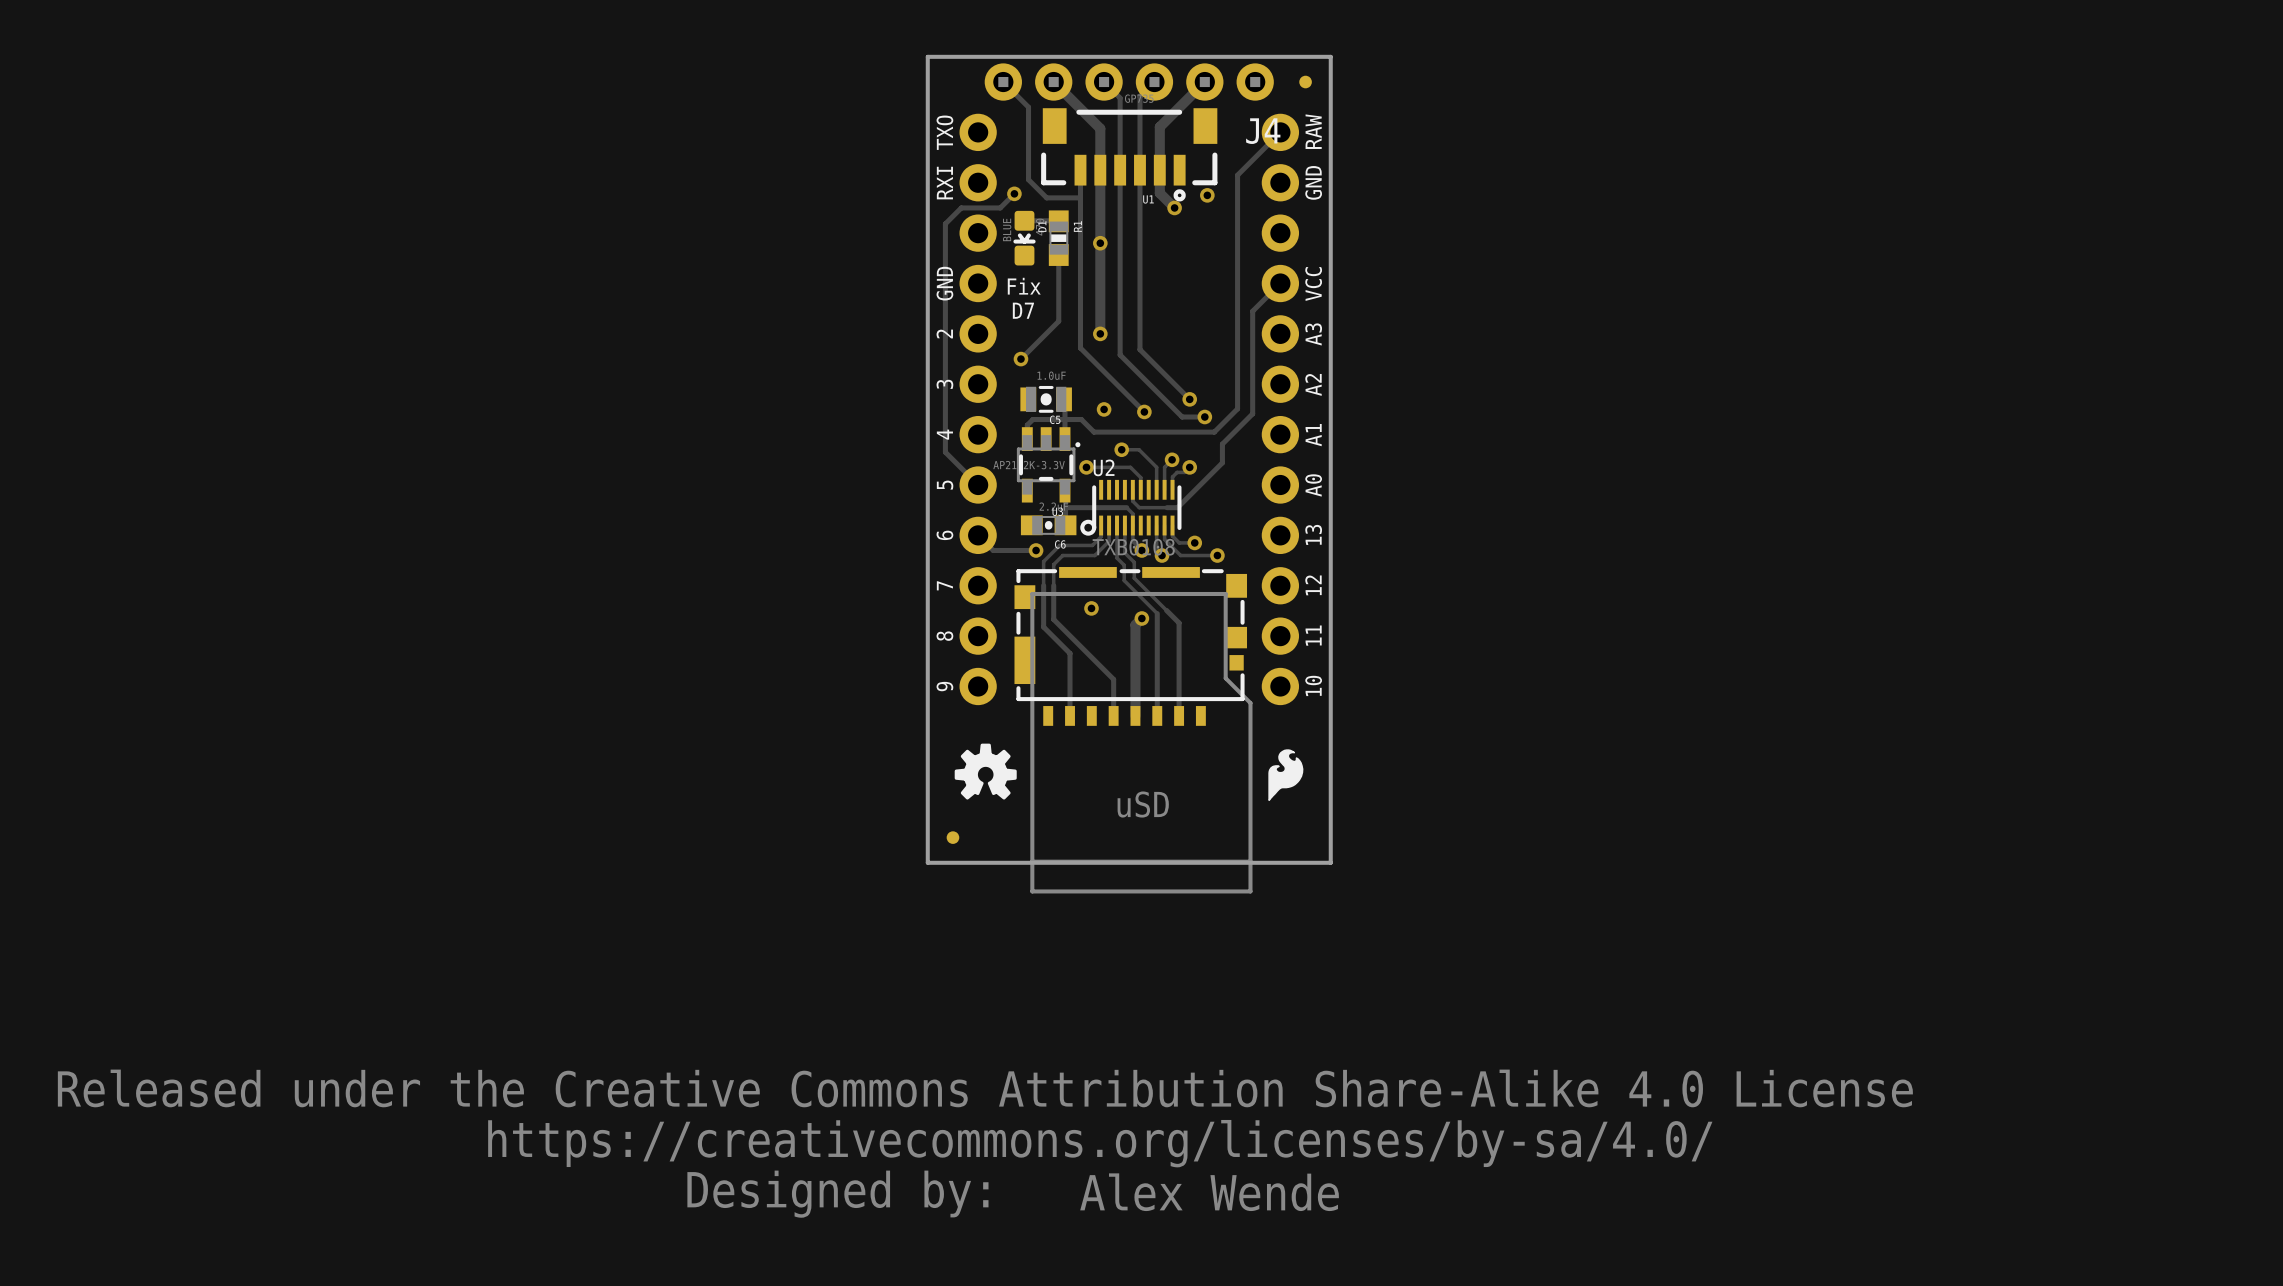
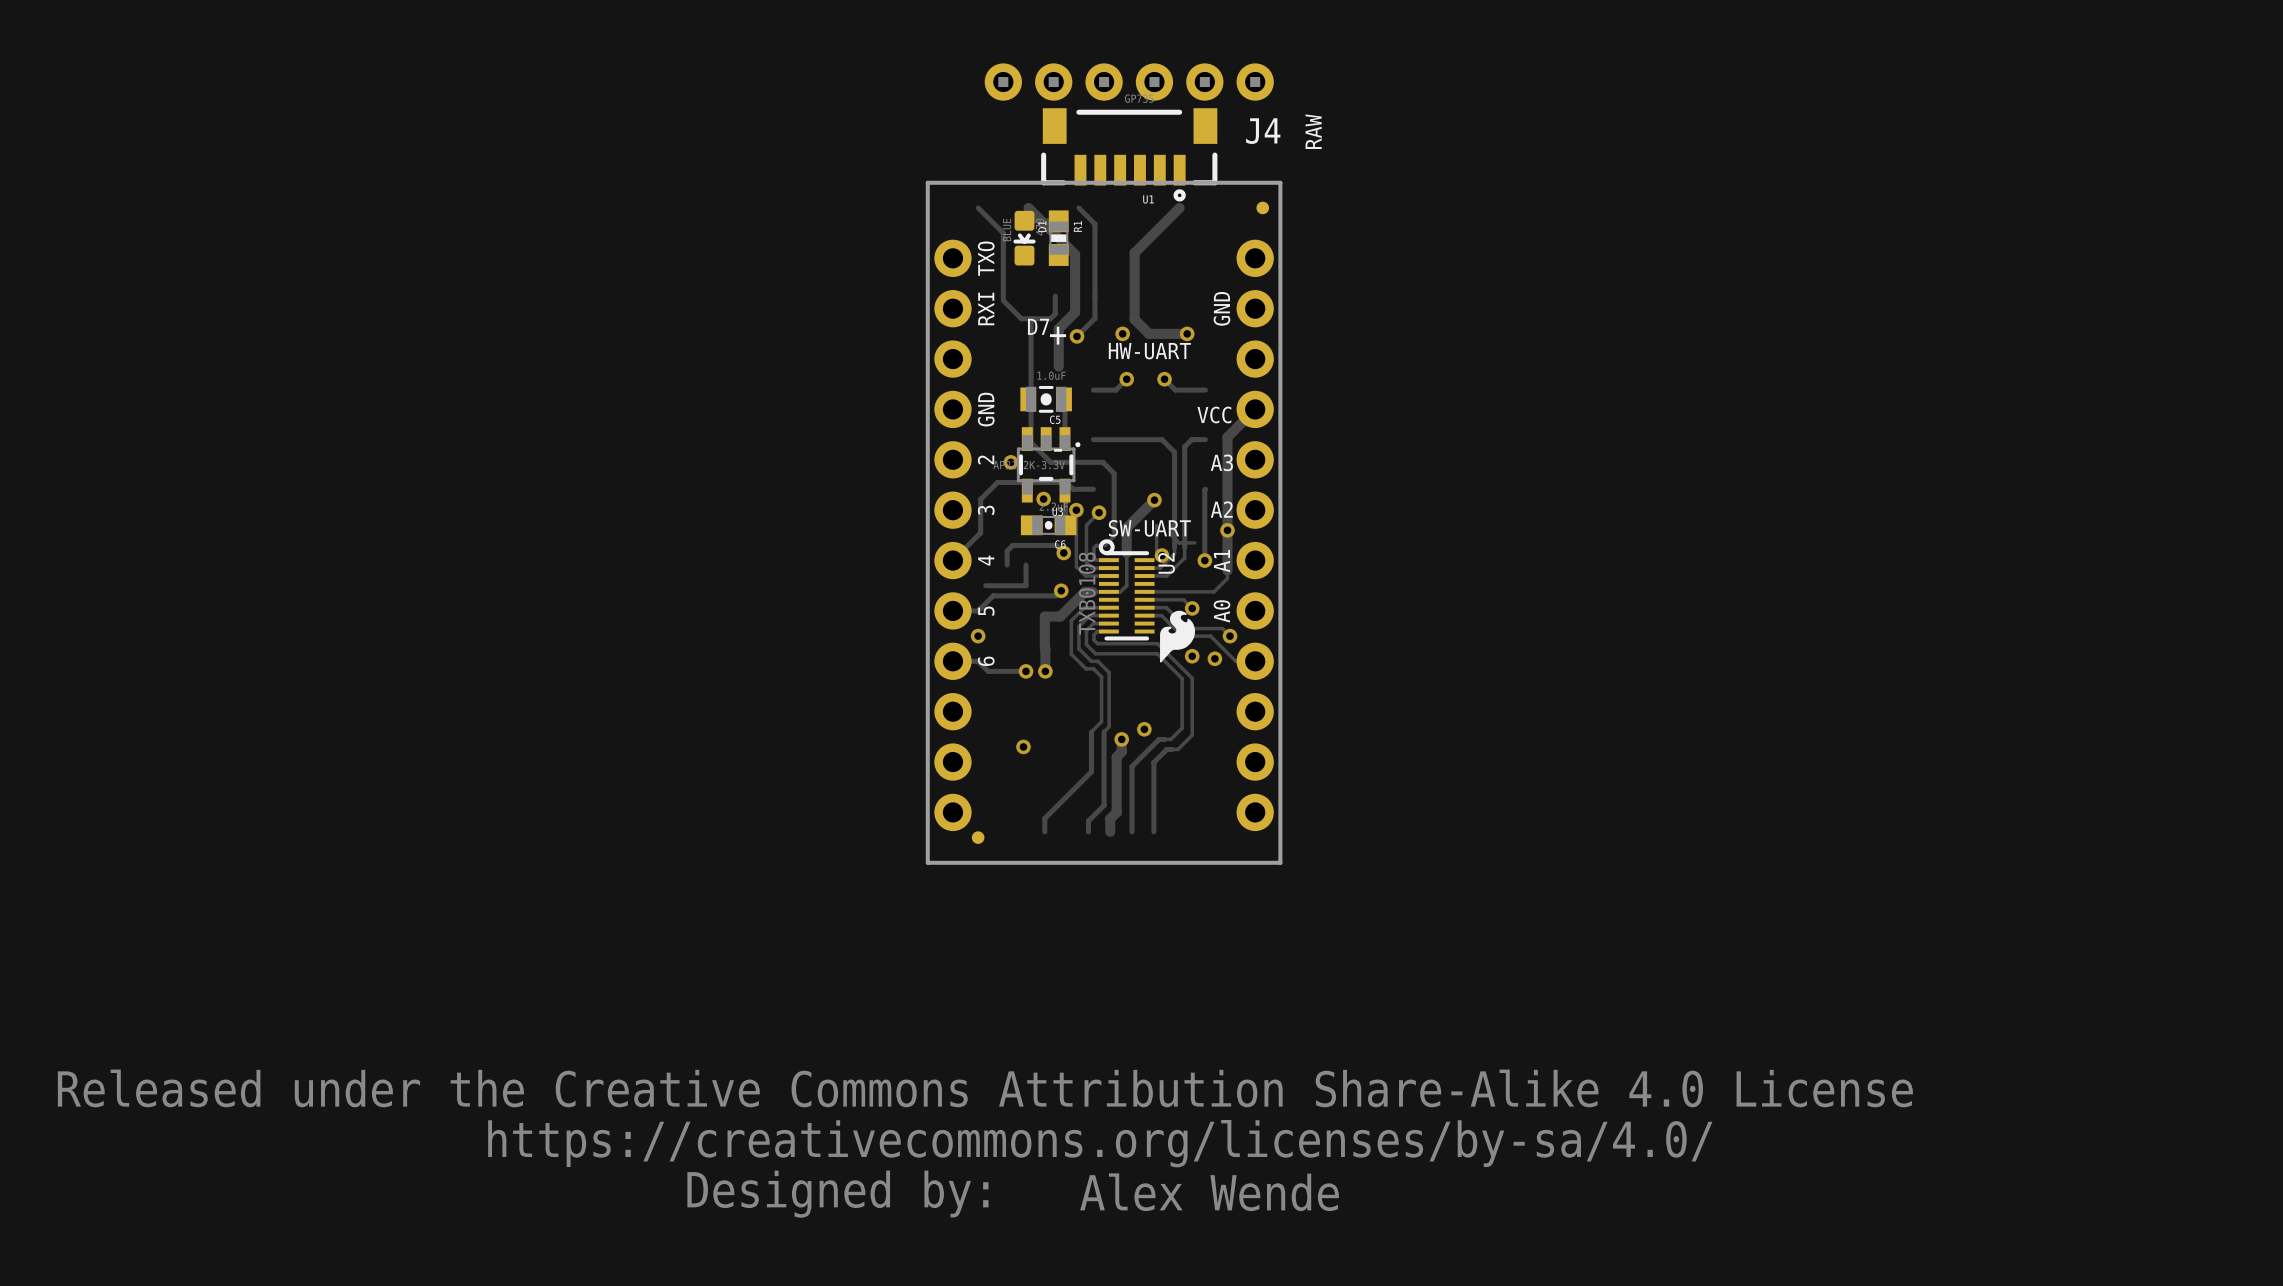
track: (1003, 82) (1028, 107) (1028, 179) (1046, 197) (1080, 197) -> none
track: (1053, 82) (1100, 128) (1100, 333) -> none
track: (1104, 82) (1120, 98) (1120, 354) (1182, 417) (1204, 417) -> none
track: (1154, 82) (1139, 96) (1139, 349) (1189, 399) -> none
track: (1204, 82) (1159, 127) (1159, 193) (1174, 207) -> none
part position: (1305, 82) -> (1262, 207)
text position: TXO (944, 132) -> TXO (986, 258)
track: (1280, 132) (1237, 175) (1237, 408) (1214, 432) (1094, 432) (1081, 419) (1032, 419) (1027, 425) (1027, 439) -> none
track: (1080, 170) (1080, 348) (1144, 411) -> none
board edge: (927, 182) (927, 56) (1330, 56) (1330, 862) (1280, 862) -> (927, 182) (1280, 182) (1280, 862)
text: GND (1313, 182) -> none
text position: RXI (944, 183) -> RXI (986, 308)
track: (1014, 193) (1000, 207) (961, 207) (945, 223) (945, 452) (978, 485) -> none
via: (1014, 193) -> none
via: (1207, 195) -> none
track: none -> (978, 207) (1003, 233) (1003, 300) (1021, 318) (1050, 318) (1055, 313) (1055, 296)
track: none -> (1028, 207) (1075, 254) (1075, 312) (1058, 328) (1058, 366)
track: none -> (1078, 207) (1094, 224) (1094, 318) (1077, 336)
via: (1174, 207) -> none
track: none -> (1179, 207) (1134, 252) (1134, 319) (1149, 333) (1187, 333)
via: (1100, 243) -> none
track: (1058, 255) (1058, 321) (1020, 359) -> none
text position: GND (944, 283) -> GND (986, 409)
track: (1280, 283) (1252, 311) (1252, 413) (1222, 444) (1222, 462) (1177, 507) (1139, 507) (1132, 501) (1132, 489) -> none
text rotation: 0° (1313, 284) -> 90° clockwise (1214, 415)
text position: VCC (1313, 284) -> VCC (1214, 415)
text: Fix (1024, 286) -> none
text: none -> GND (1221, 308)
text position: D7 (1023, 310) -> D7 (1038, 326)
track: none -> (1031, 318) (1031, 442) (1050, 462) (1102, 462) (1114, 473) (1114, 536) (1105, 545) (1096, 545) (1094, 547) (1094, 558) (1096, 560) (1108, 560)
text position: 2 (944, 333) -> 2 (986, 459)
via: (1100, 333) -> none
via: none -> (1122, 333)
via: none -> (1187, 333)
text rotation: 0° (1313, 334) -> 90° clockwise (1221, 462)
text position: A3 (1313, 334) -> A3 (1221, 462)
text: none -> + (1058, 335)
via: none -> (1077, 336)
text: none -> HW-UART (1149, 351)
via: (1020, 359) -> none
track: none -> (1126, 379) (1115, 390) (1093, 390)
via: none -> (1126, 379)
track: none -> (1164, 379) (1175, 390) (1205, 390)
via: none -> (1164, 379)
text position: 3 (944, 384) -> 3 (986, 510)
text rotation: 0° (1313, 384) -> 90° clockwise (1221, 509)
text position: A2 (1313, 384) -> A2 (1221, 509)
via: (1189, 399) -> none
part position: (978, 409) -> (952, 535)
via: (1104, 409) -> none
track: none -> (1255, 409) (1227, 437) (1227, 578) (1214, 591) (1144, 591)
part position: (1280, 409) -> (1255, 535)
via: (1144, 411) -> none
via: (1204, 417) -> none
text position: 4 (944, 434) -> 4 (986, 560)
text position: A1 (1313, 435) -> A1 (1221, 561)
track: none -> (1093, 439) (1162, 439) (1174, 452) (1174, 553) (1160, 568) (1144, 568)
track: none -> (1205, 439) (1191, 439) (1184, 446) (1184, 557) (1166, 575) (1144, 575)
track: (1121, 449) (1139, 449) (1156, 467) (1156, 489) -> none
via: (1121, 449) -> none
text: none -> - (1058, 450)
track: (1172, 459) (1164, 467) (1164, 489) -> none
via: (1172, 459) -> none
via: none -> (1010, 462)
track: (1086, 467) (1130, 467) (1140, 477) (1140, 489) -> none
via: (1086, 467) -> none
track: (1189, 467) (1184, 472) (1177, 472) (1172, 477) (1172, 489) -> none
via: (1189, 467) -> none
text position: 5 (945, 485) -> 5 (986, 611)
text position: A0 (1313, 485) -> A0 (1221, 611)
track: none -> (1093, 489) (1073, 489) (1066, 482) (997, 482) (980, 499) (980, 532) (952, 560)
track: none -> (1205, 489) (1204, 560)
via: none -> (1043, 499)
track: none -> (1154, 500) (1126, 527) (1126, 585) (1120, 591) (1085, 591) (1060, 616) (1044, 616) (1045, 671)
via: none -> (1154, 500)
track: (1065, 507) (1126, 507) (1132, 513) (1132, 541) (1141, 550) -> none
U2 rotation: 0° (1130, 507) -> 90° clockwise (1126, 589)
U2 position: (1130, 507) -> (1126, 589)
track: none -> (1076, 510) (1076, 566) (1085, 575) (1108, 575)
via: none -> (1076, 510)
track: none -> (1099, 512) (1086, 525) (1086, 562) (1092, 568) (1108, 568)
via: none -> (1099, 512)
track: (1101, 525) (1101, 536) (1092, 545) (1059, 545) (1043, 561) (1043, 627) (1070, 653) (1070, 715) -> none
track: (1109, 525) (1109, 541) (1094, 555) (1062, 555) (1053, 564) (1053, 619) (1113, 679) (1113, 715) -> none
track: (1116, 525) (1116, 558) (1124, 565) (1124, 580) (1157, 613) (1157, 715) -> none
track: (1124, 525) (1124, 553) (1134, 562) (1134, 578) (1179, 622) (1179, 715) -> none
track: (1164, 525) (1164, 539) (1180, 555) (1217, 555) -> none
text: none -> SW-UART (1149, 528)
via: none -> (1227, 530)
text: 13 (1313, 534) -> none
text position: 6 (944, 535) -> 6 (986, 661)
track: (978, 535) (993, 550) (1036, 550) -> none
via: (1194, 542) -> none
via: (1036, 550) -> none
via: (1141, 550) -> none
track: none -> (1063, 553) (1056, 545) (1012, 545) (1007, 551) (1007, 565)
via: none -> (1063, 553)
via position: (1217, 555) -> (1204, 560)
track: none -> (1026, 565) (1026, 585) (985, 585)
text: 7 (944, 585) -> none
text: 12 (1313, 585) -> none
track: none -> (1061, 590) (1056, 595) (993, 595) (978, 610) (952, 610)
via: none -> (1061, 590)
track: none -> (1144, 599) (1183, 599) (1192, 608)
track: none -> (1108, 607) (1084, 607) (1071, 620) (1071, 654) (1086, 668) (1093, 668) (1101, 676) (1101, 721) (1091, 731) (1091, 771) (1044, 818) (1044, 831)
track: none -> (1144, 607) (1166, 607) (1187, 628) (1222, 628) (1230, 636)
via: (1091, 608) -> none
via: none -> (1192, 608)
track: none -> (1108, 615) (1089, 615) (1078, 626) (1078, 648) (1091, 661) (1097, 661) (1109, 672) (1109, 726) (1104, 731) (1104, 805) (1088, 820) (1088, 831)
track: none -> (1144, 615) (1161, 615) (1182, 636) (1210, 636) (1235, 661) (1255, 661)
track: (1141, 618) (1135, 624) (1135, 715) -> none
via: (1141, 618) -> none
track: none -> (1108, 623) (1093, 623) (1086, 630) (1086, 644) (1095, 653) (1157, 653) (1182, 678) (1182, 728) (1170, 739) (1159, 739) (1132, 766) (1132, 831)
track: none -> (1108, 631) (1097, 631) (1094, 634) (1094, 640) (1097, 643) (1157, 643) (1192, 678) (1192, 735) (1177, 749) (1166, 749) (1153, 762) (1153, 831)
text: 11 (1313, 635) -> none
text: 8 (944, 636) -> none
via: none -> (978, 636)
via: none -> (1230, 636)
via: none -> (1192, 656)
via: none -> (1214, 658)
track: none -> (952, 661) (978, 661) (988, 671) (1026, 671)
via: none -> (1026, 671)
via: none -> (1045, 671)
text: 10 (1313, 685) -> none
text: 9 (944, 686) -> none
via: none -> (1144, 729)
part: (1133, 730) -> none
track: none -> (1121, 739) (1121, 751) (1116, 757) (1116, 812) (1110, 818) (1110, 831)
via: none -> (1121, 739)
drawing: [954, 743, 1017, 800] -> none
via: none -> (1023, 746)
drawing position: (1285, 775) -> (1177, 636)
part position: (952, 837) -> (978, 837)

